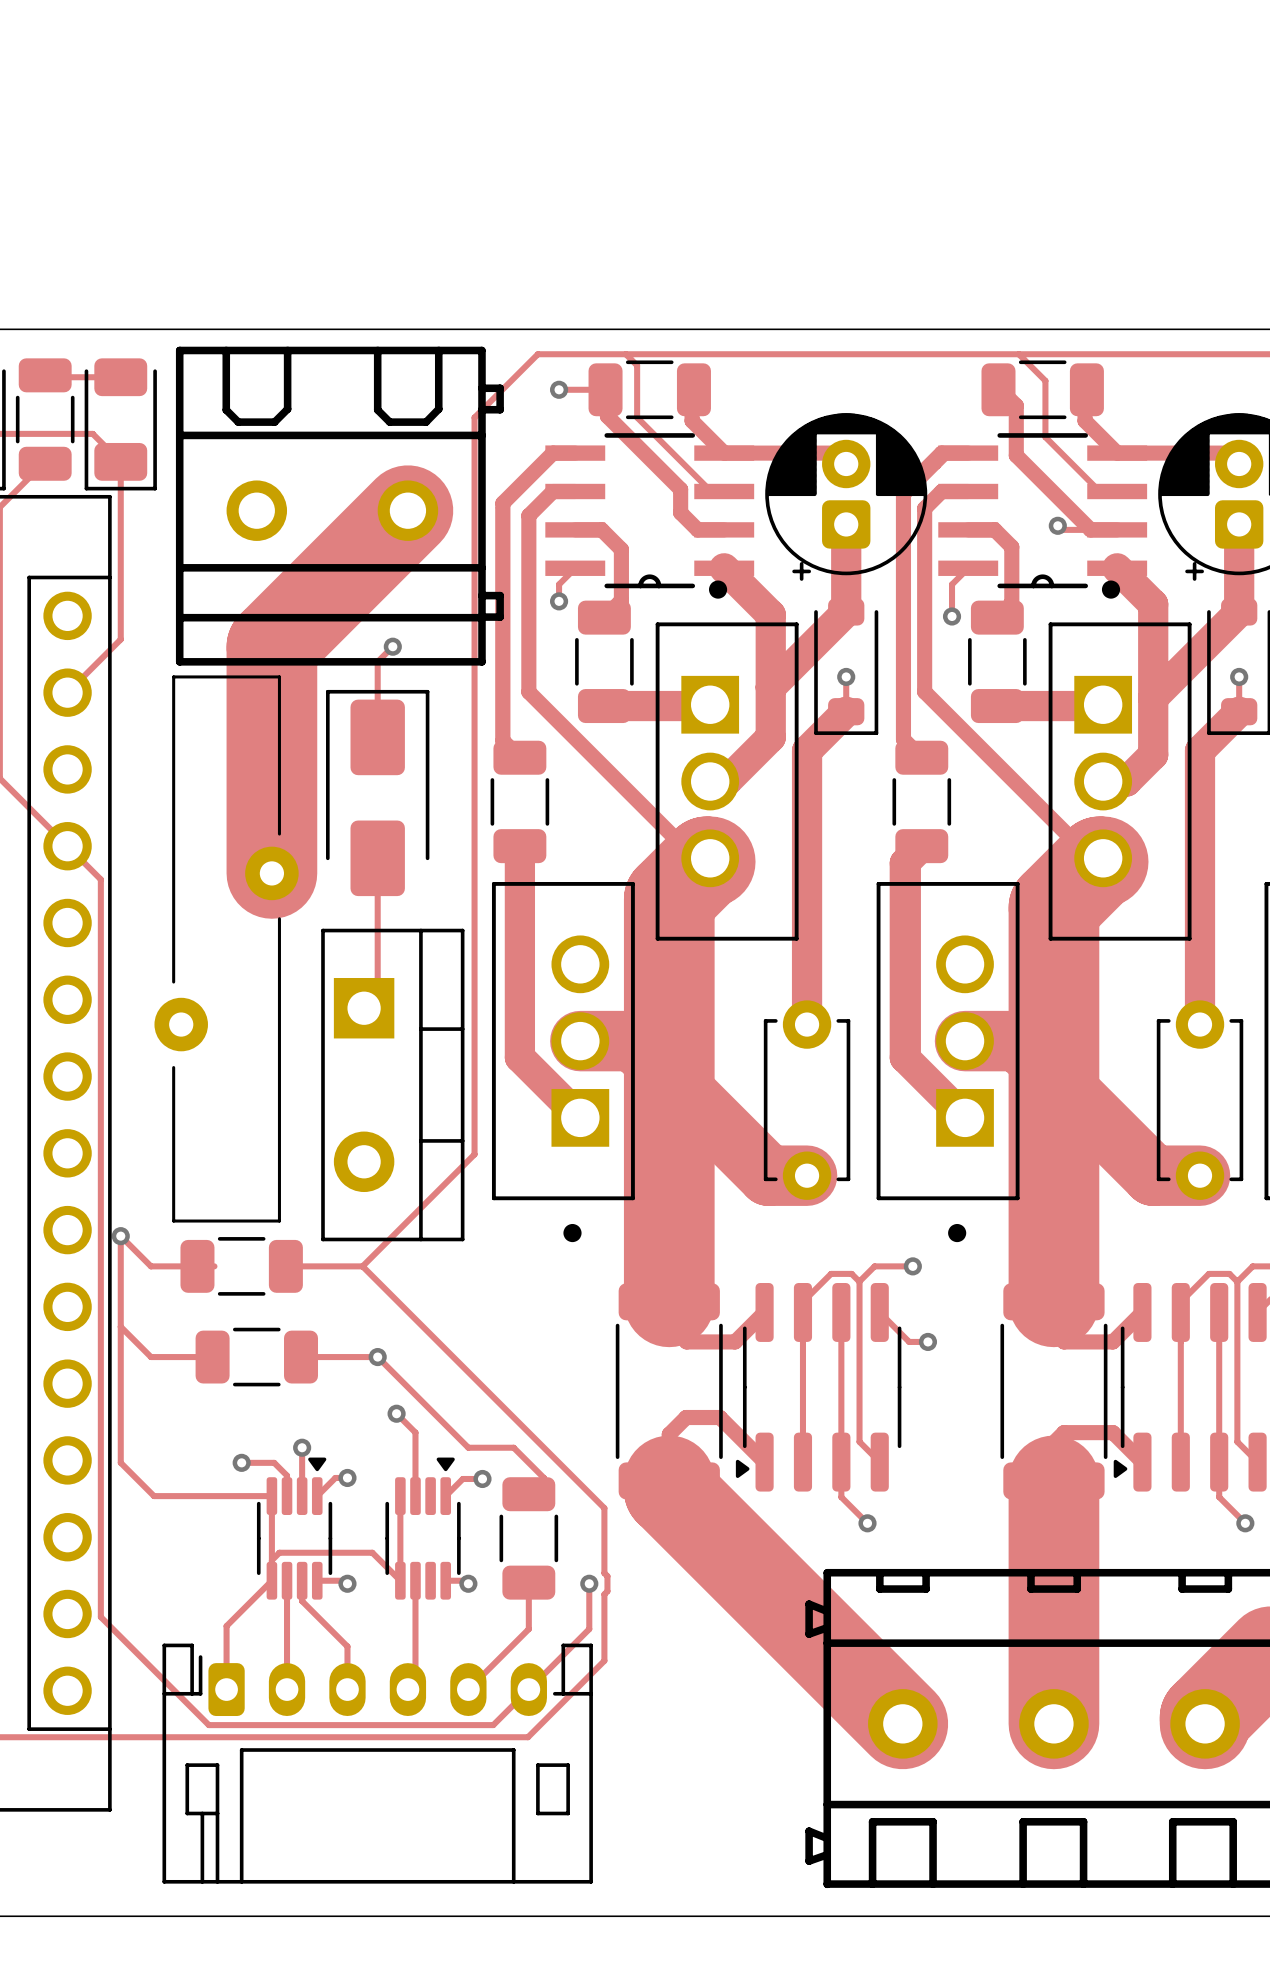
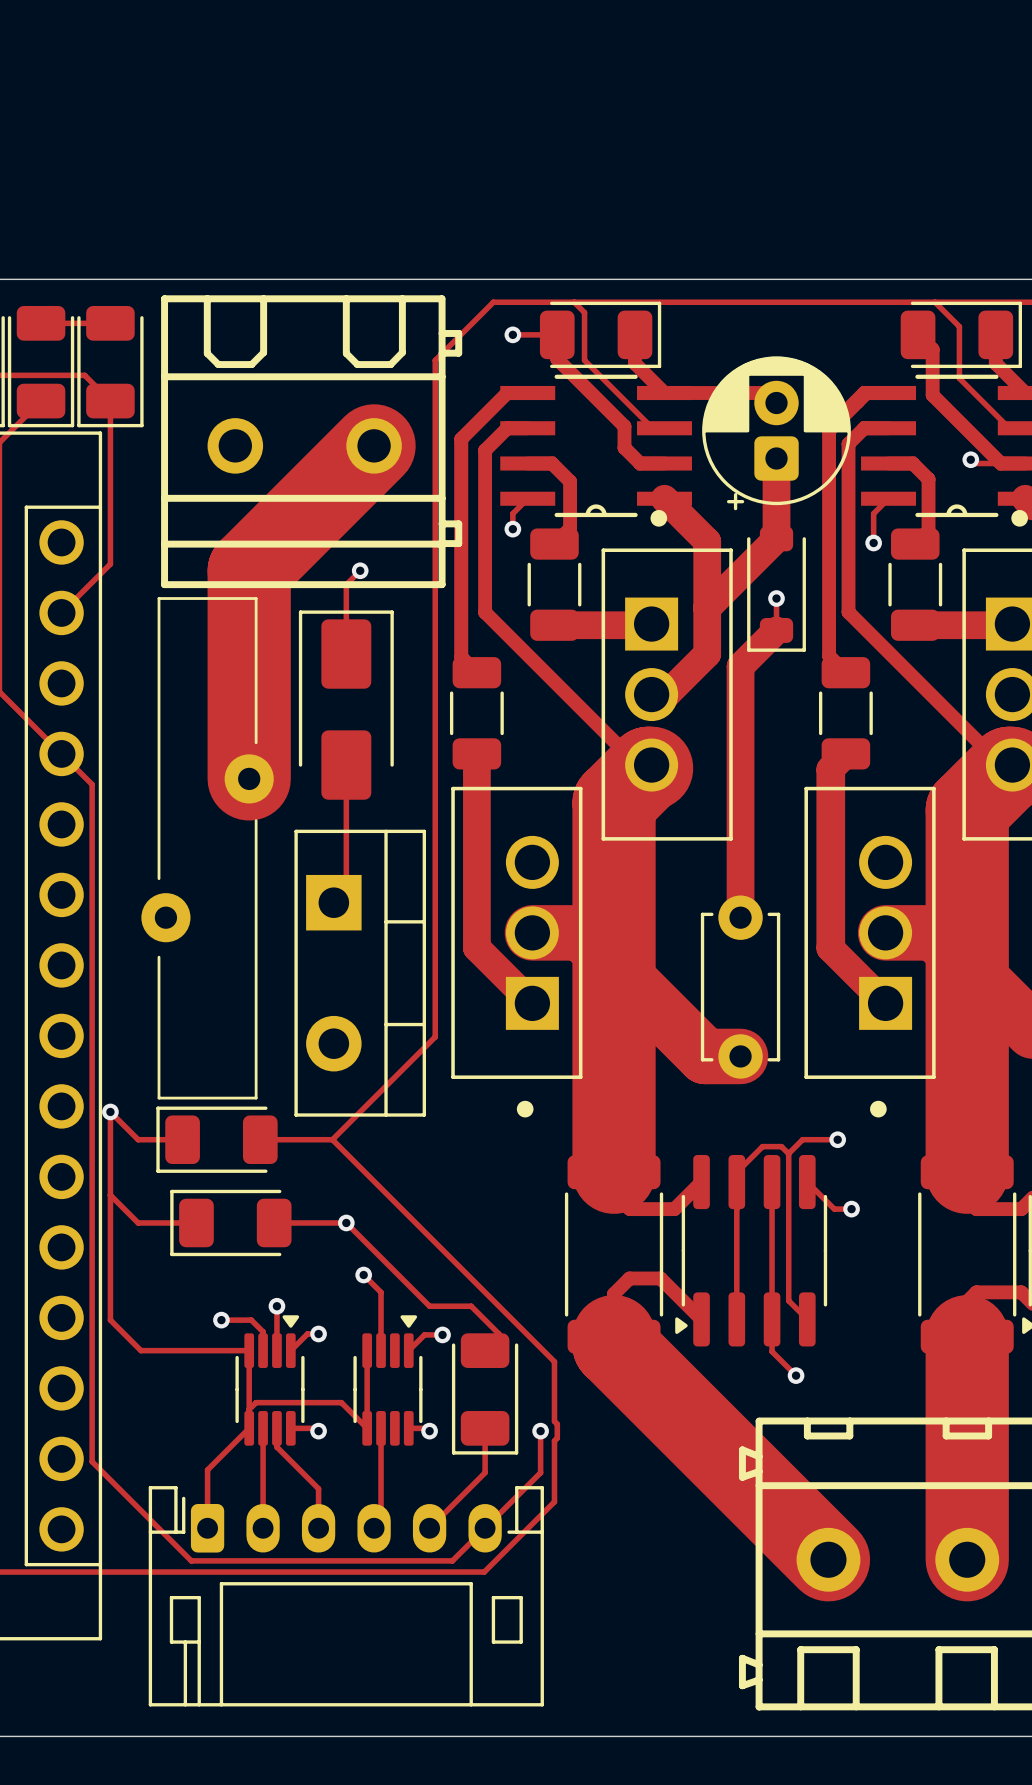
part footprint: [15, 358, 75, 481] -> [7, 306, 75, 428]
part footprint: [588, 360, 711, 420] -> [539, 301, 662, 369]
part footprint: [981, 360, 1104, 420] -> [900, 301, 1022, 369]
part footprint: [180, 1237, 303, 1296] -> [156, 1106, 278, 1173]
part footprint: [195, 1327, 319, 1387] -> [170, 1189, 292, 1257]
part footprint: [499, 1477, 559, 1600] -> [451, 1333, 519, 1455]

